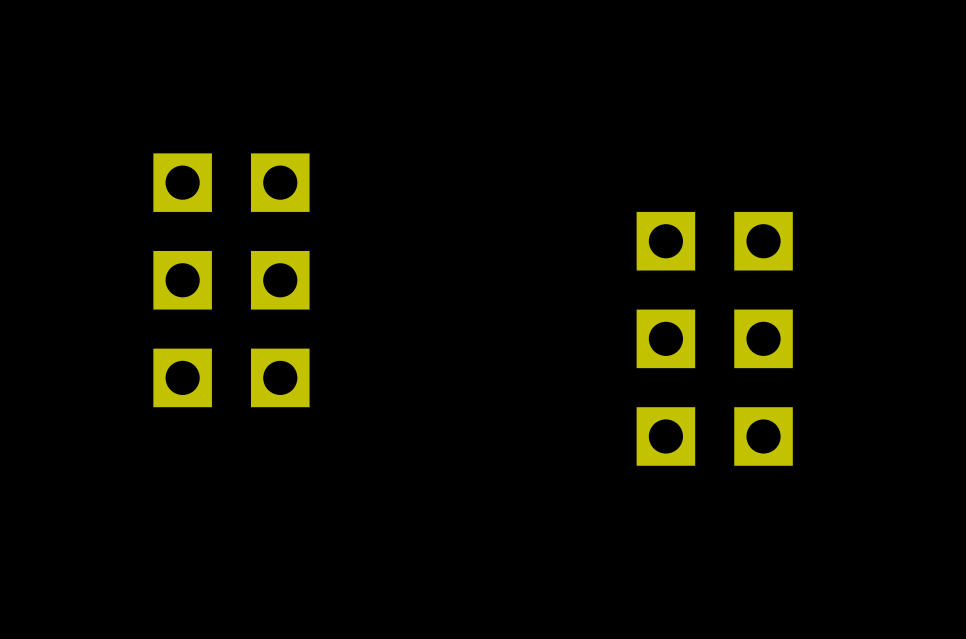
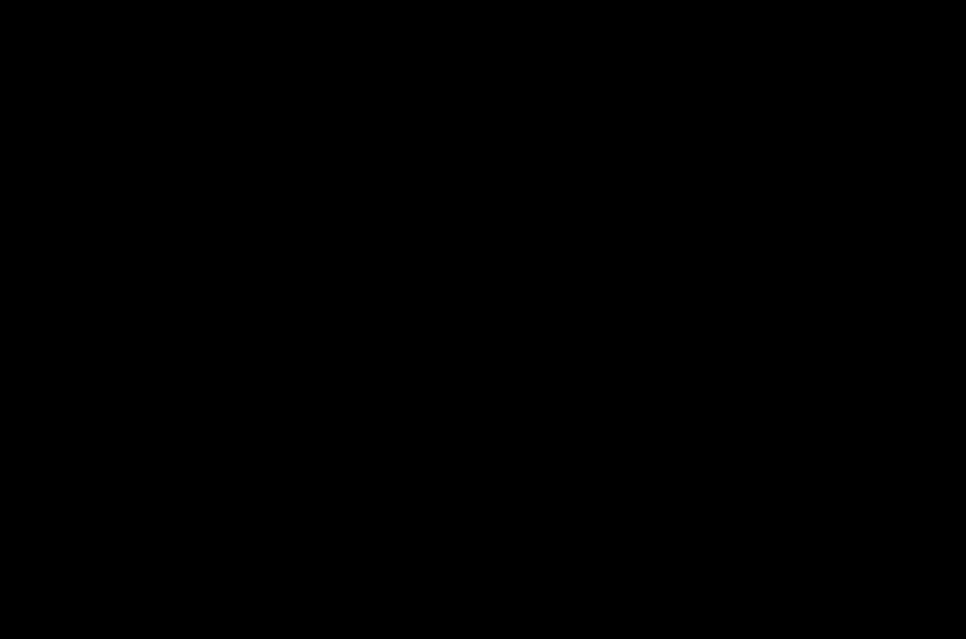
part: (231, 280) -> none
part: (714, 338) -> none

